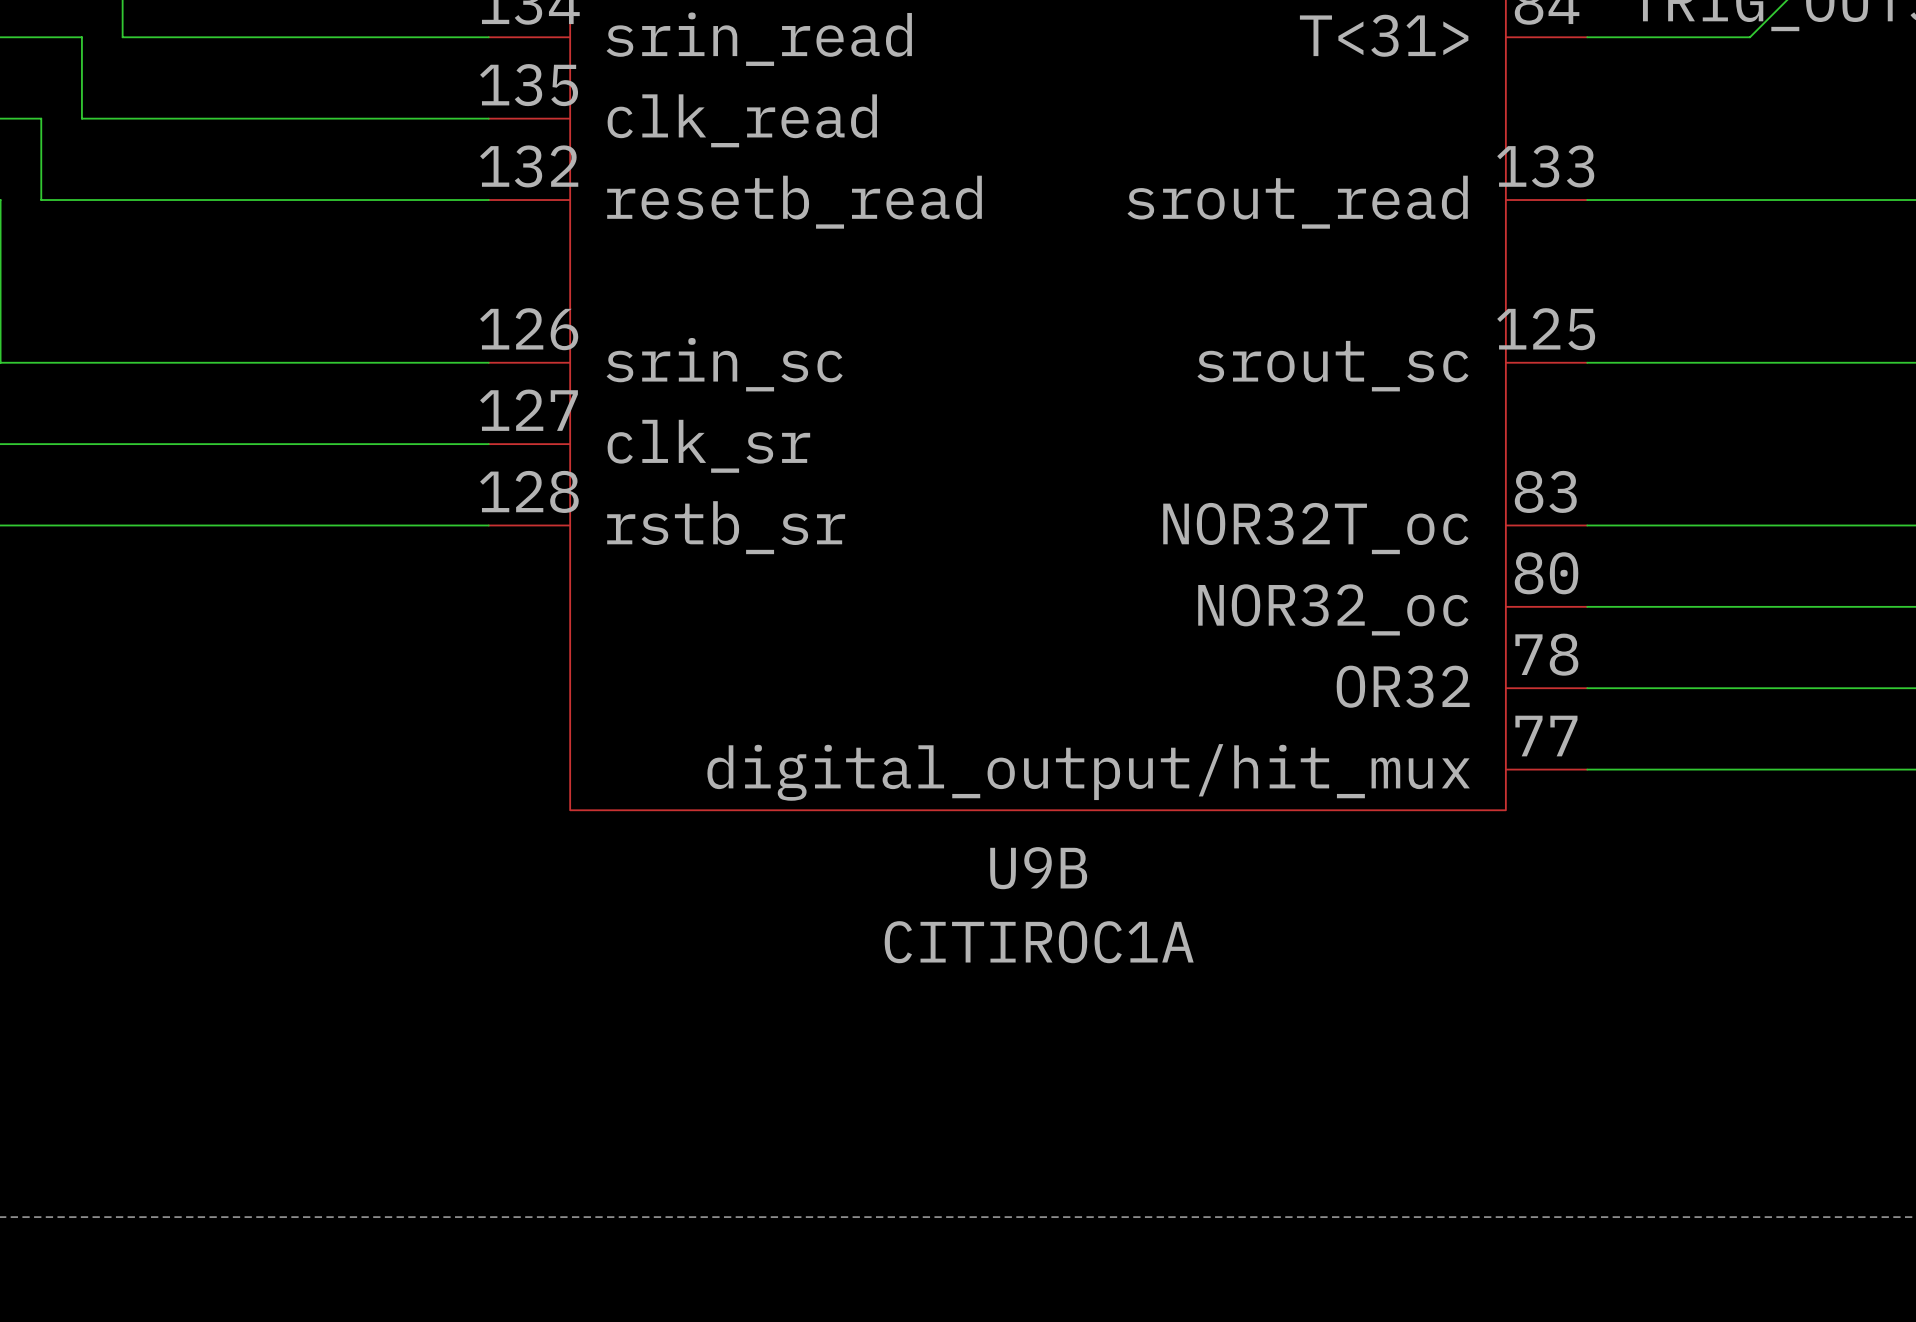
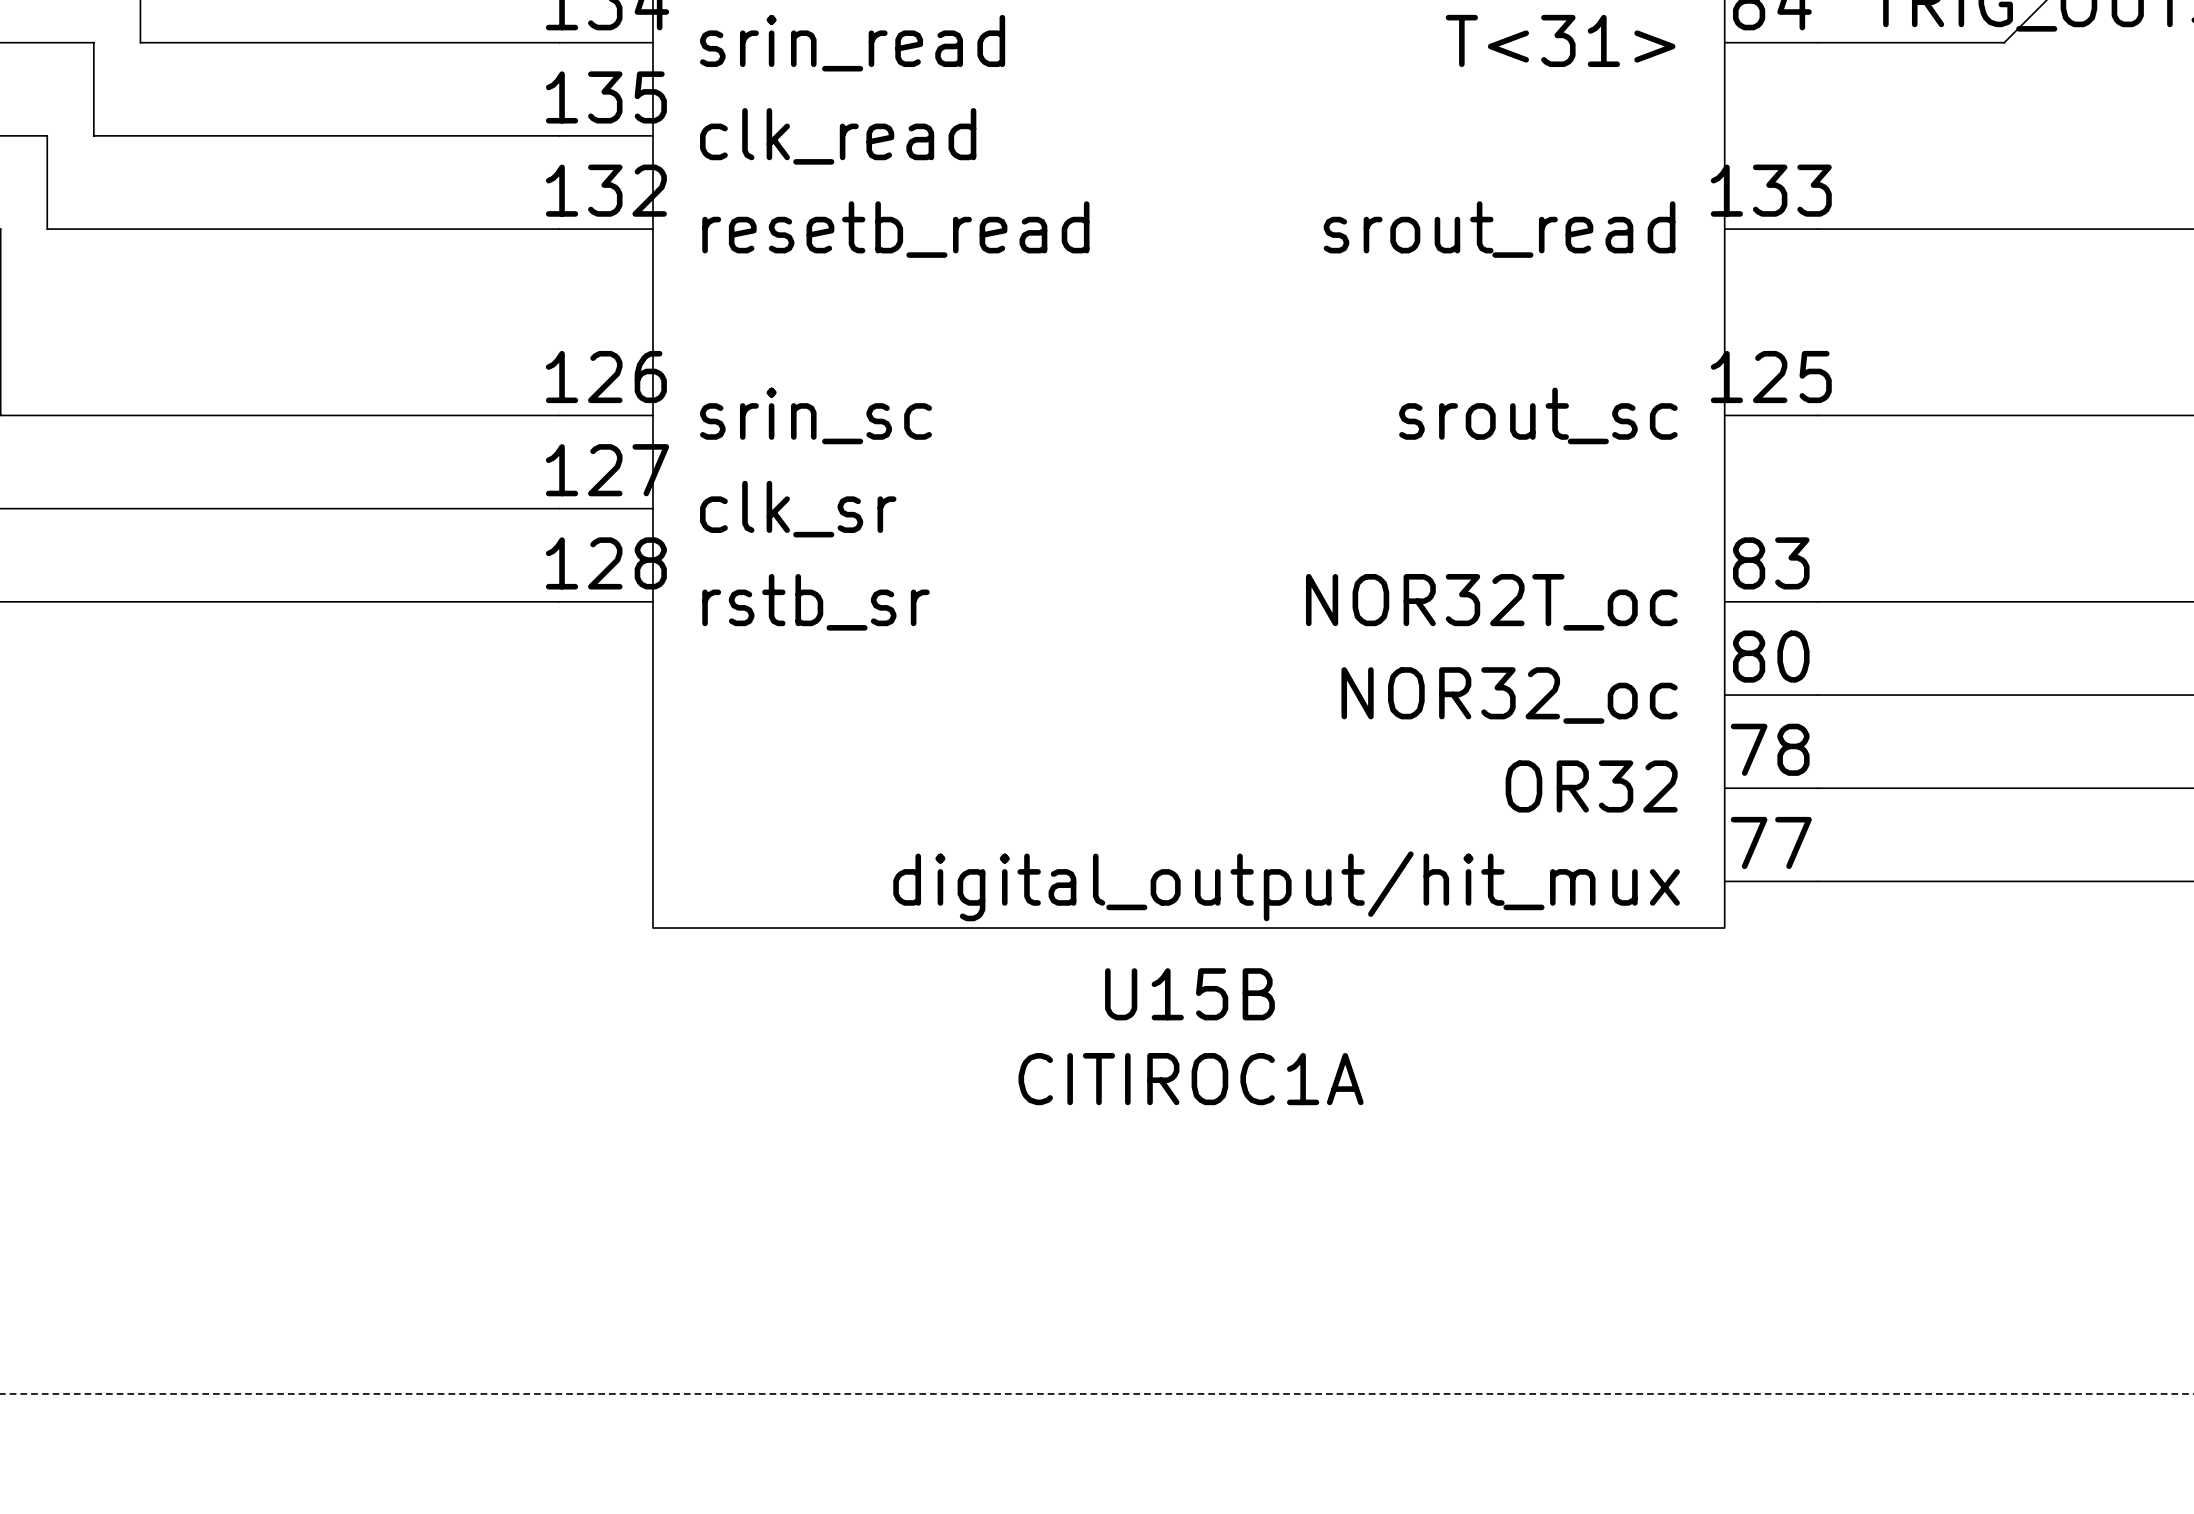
U9B name: U9B (1038, 868) -> U15B (1189, 994)

